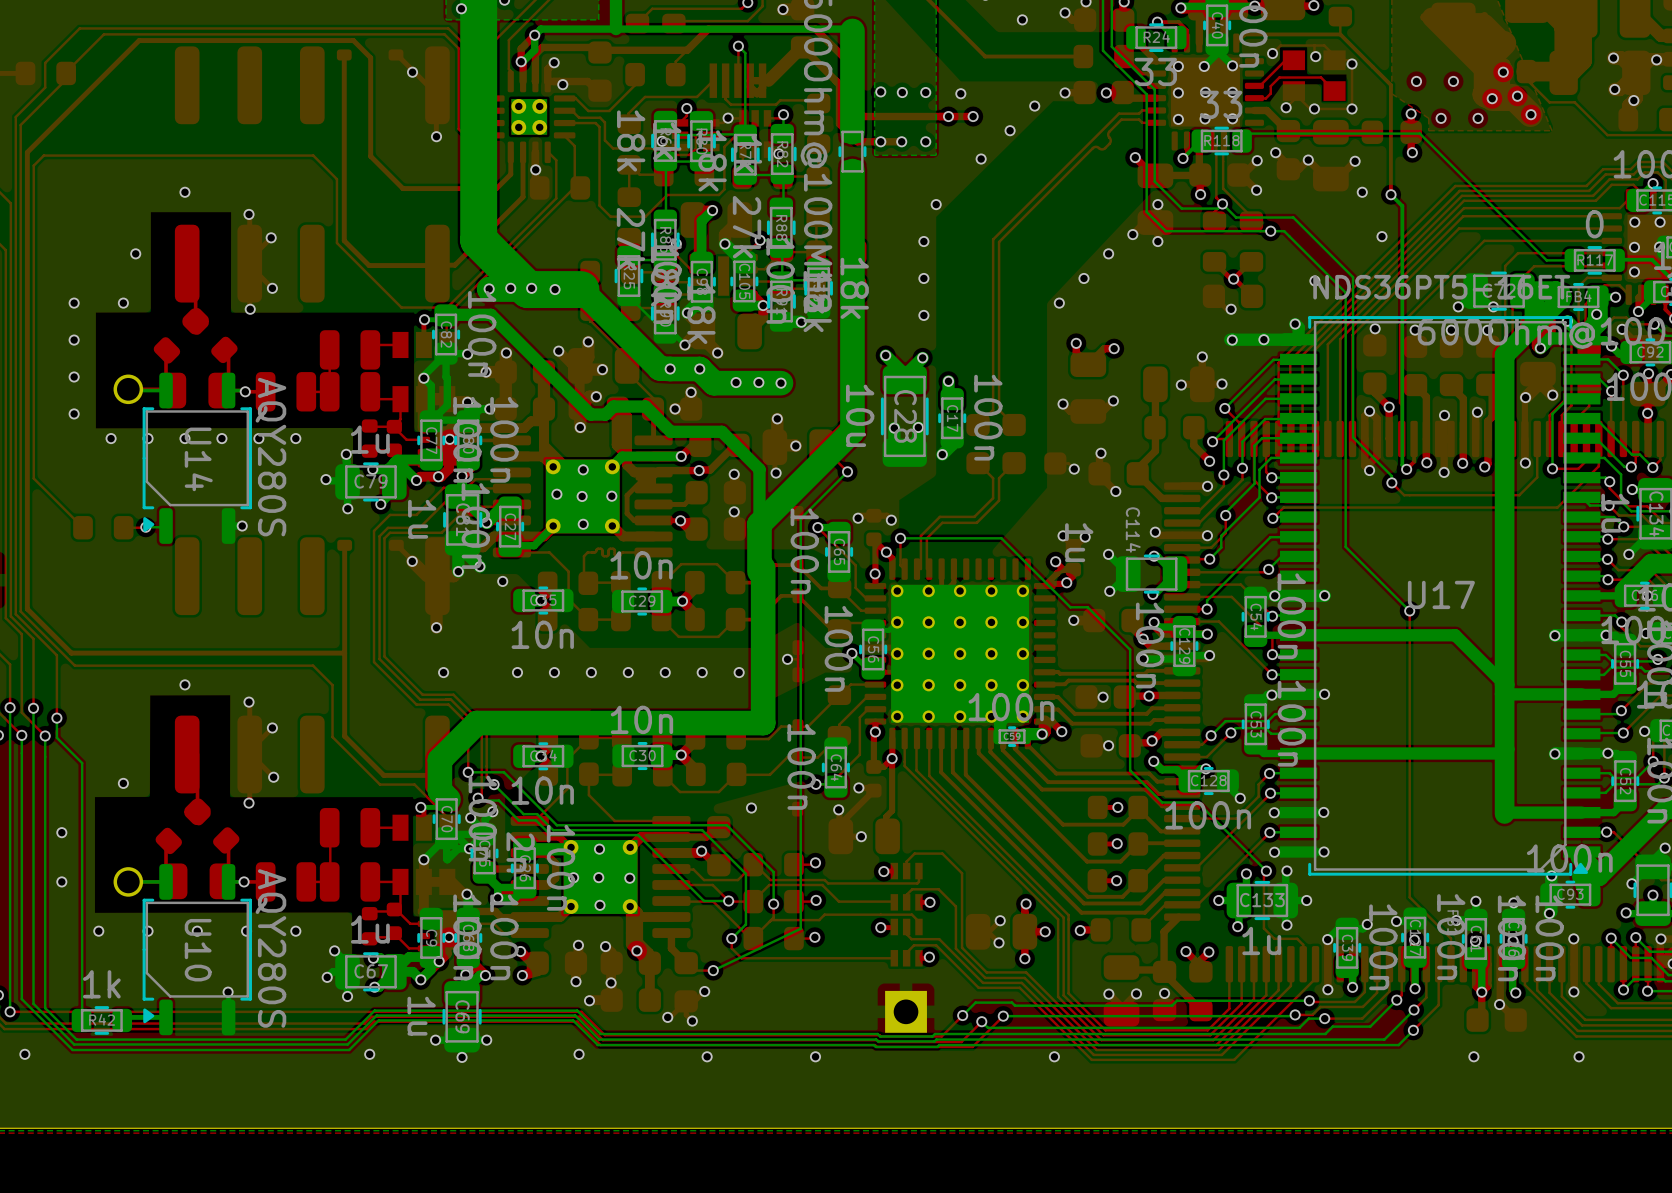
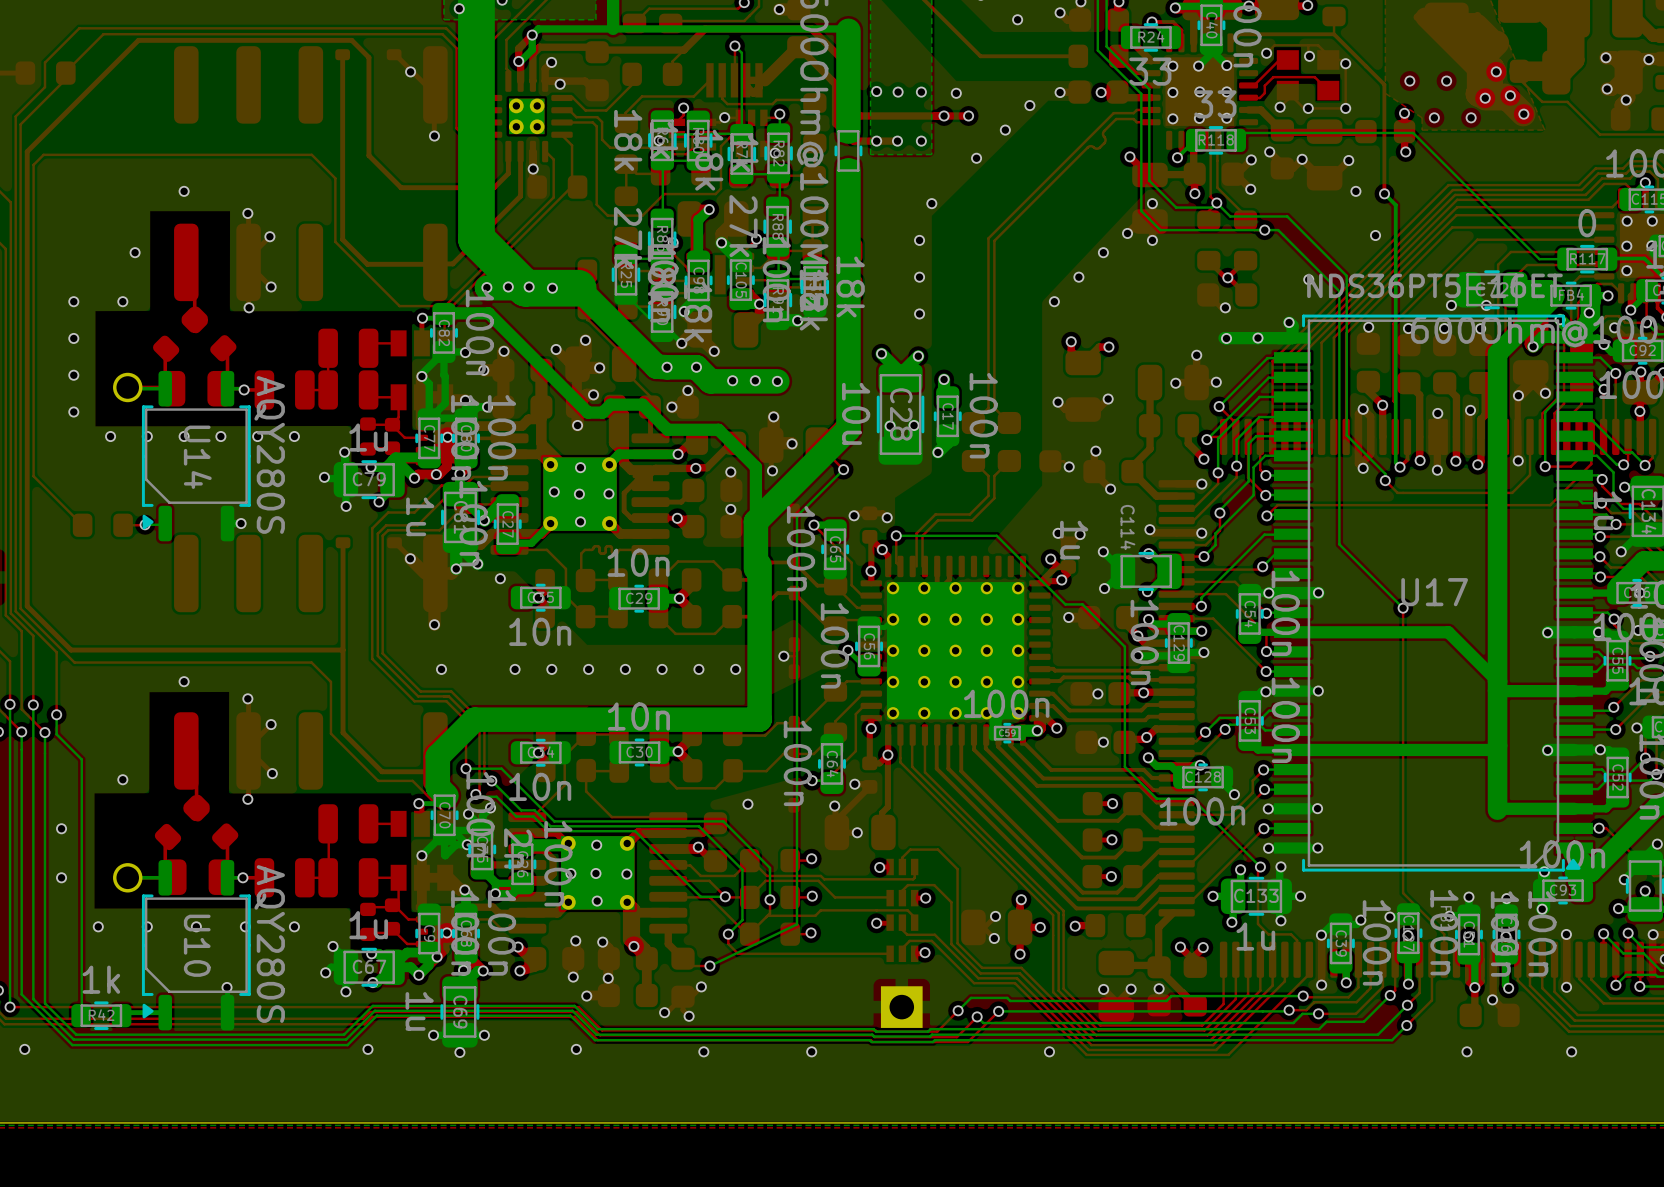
top track: none -> (1645, 292) (1646, 322)

